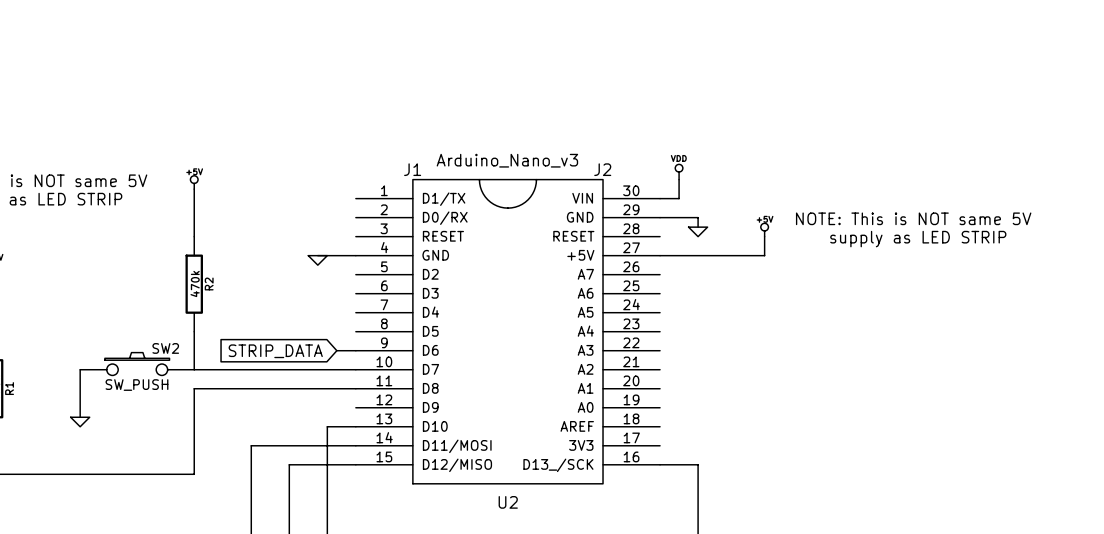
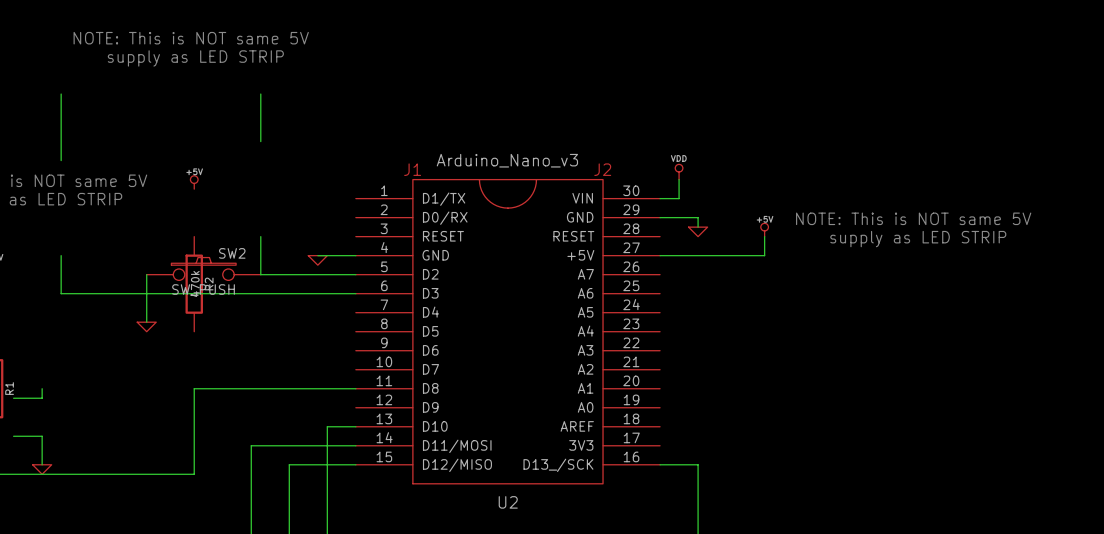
text: none -> NOTE: This is NOT same 5V (191, 38)
text: none -> supply as LED STRIP (195, 58)
wire: none -> (61, 94) (61, 160)
wire: (194, 189) (194, 236) -> (260, 94) (260, 141)
wire: none -> (260, 236) (260, 274) (355, 274)
wire: none -> (61, 255) (61, 293) (355, 293)
power symbol: none -> (146, 326)
wire: (194, 331) (194, 369) (355, 369) -> none
wire: (336, 350) (355, 350) -> none
global label: STRIP_DATA (275, 351) -> none
SW2 position: (137, 364) -> (203, 268)
wire: (80, 369) (80, 417) -> (146, 274) (146, 322)
wire: none -> (42, 388) (42, 398) (13, 398)
power symbol: (80, 422) -> none
wire: none -> (13, 436) (42, 436) (42, 464)
power symbol: none -> (42, 469)

